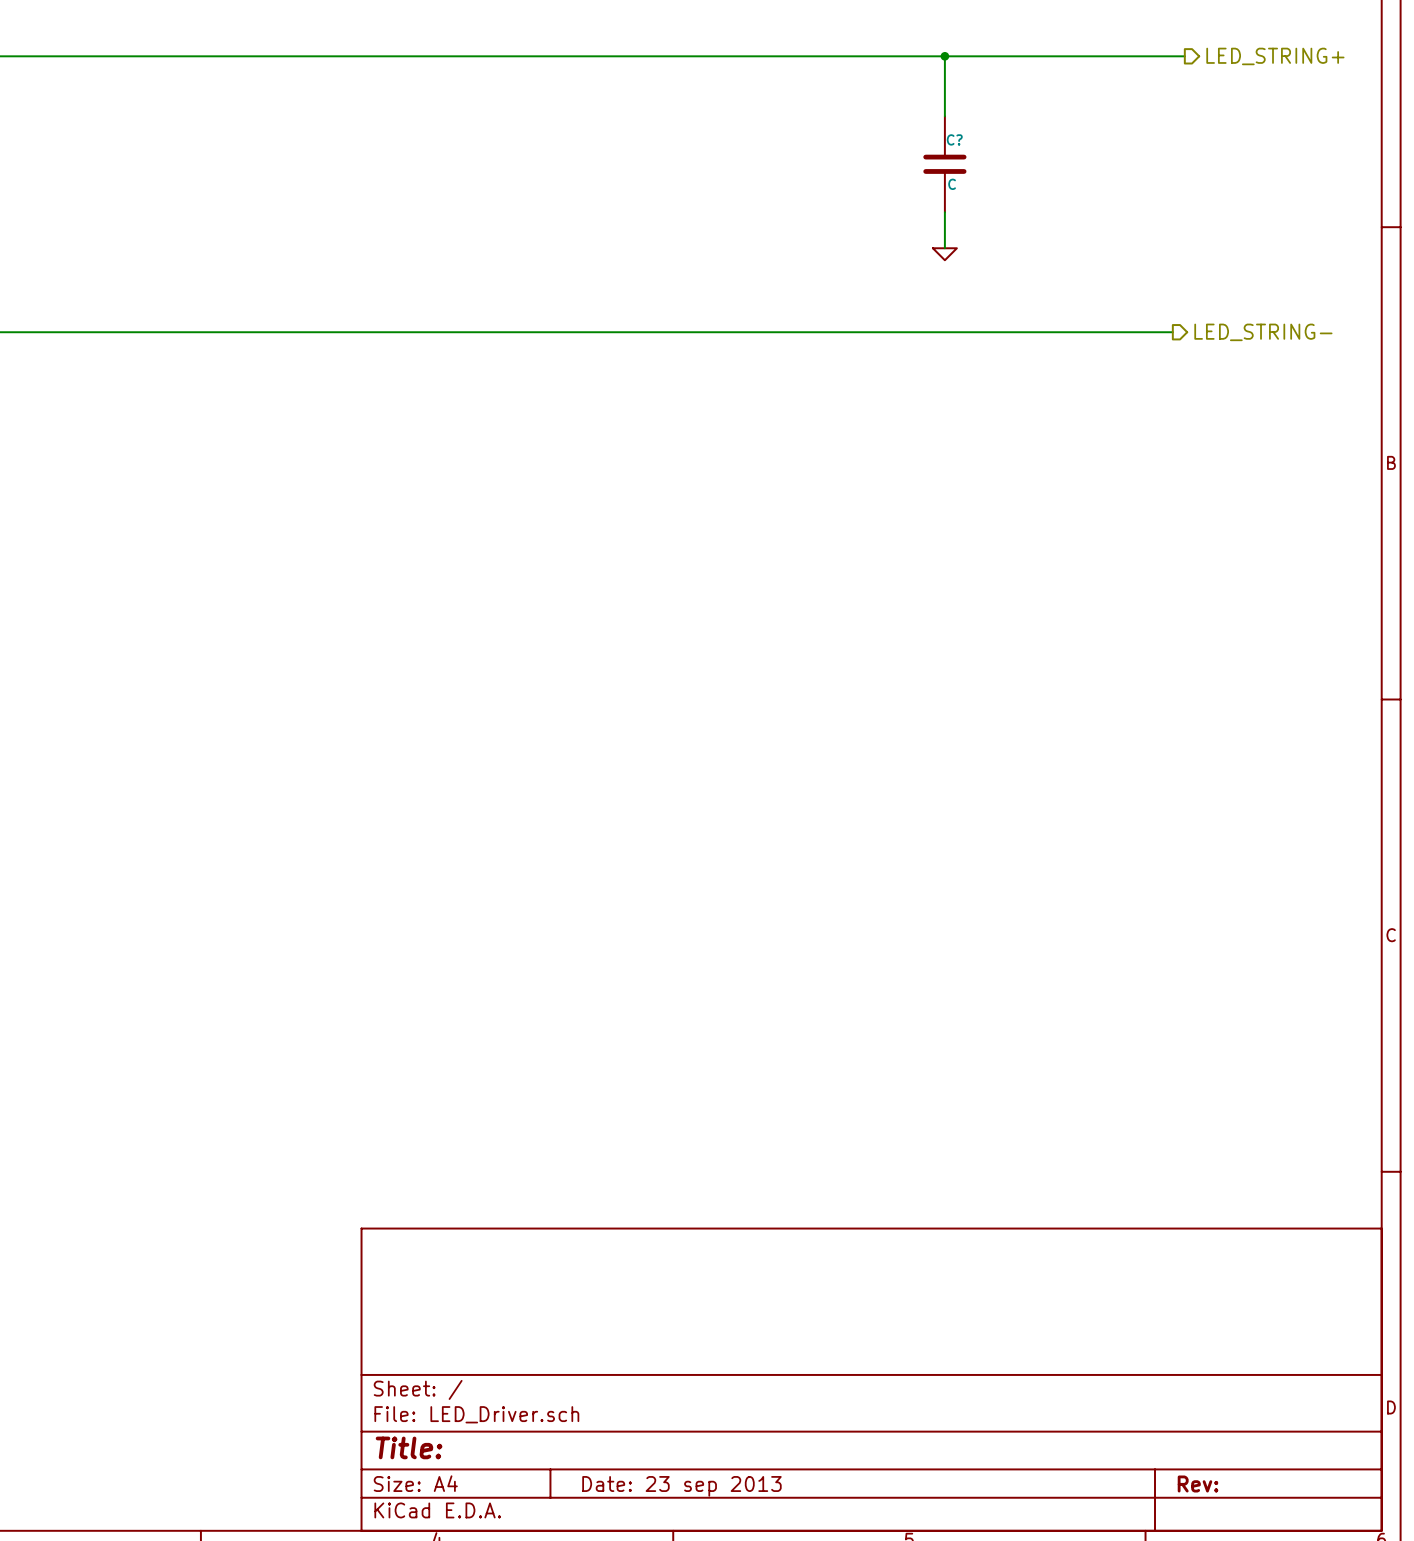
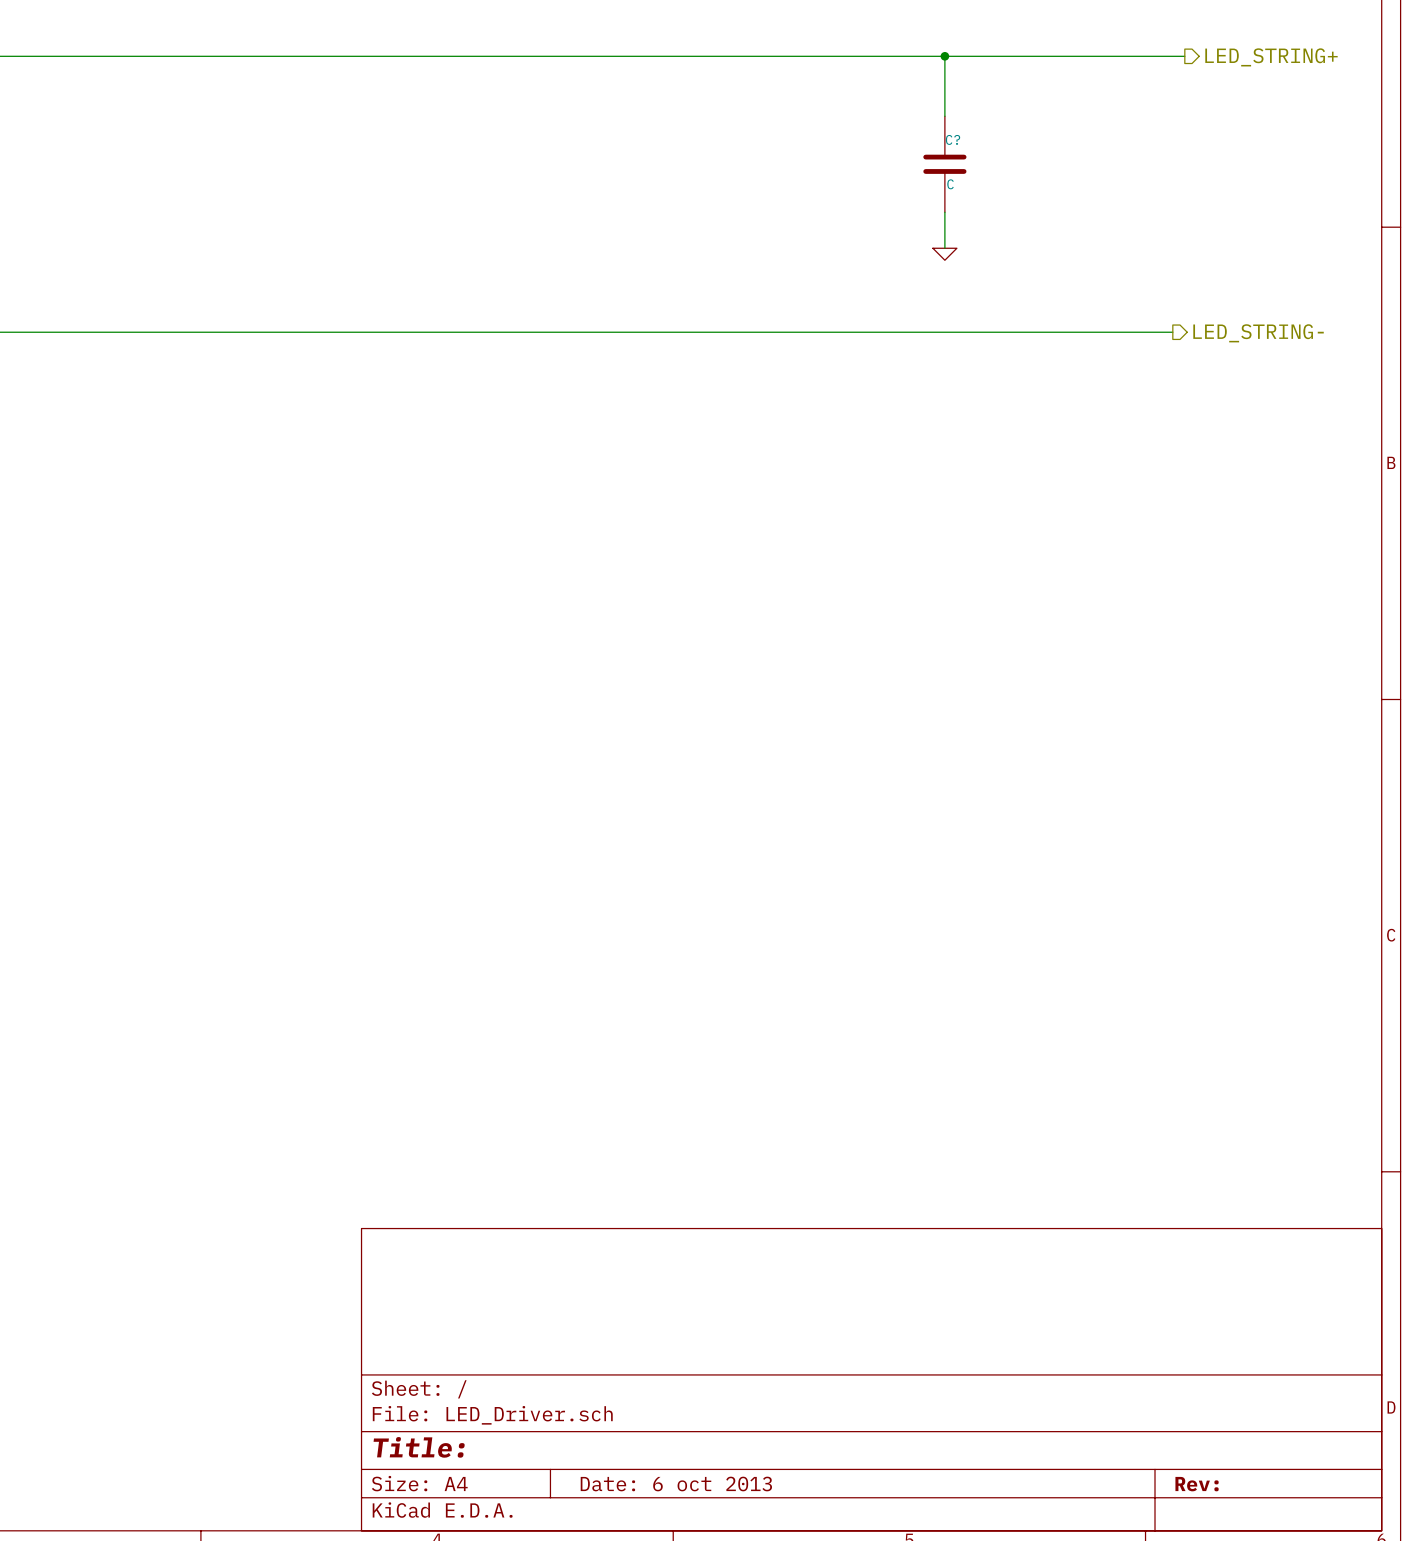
title block: Date: 23 sep 2013 (681, 1486) -> Date: 6 oct 2013 (676, 1484)

